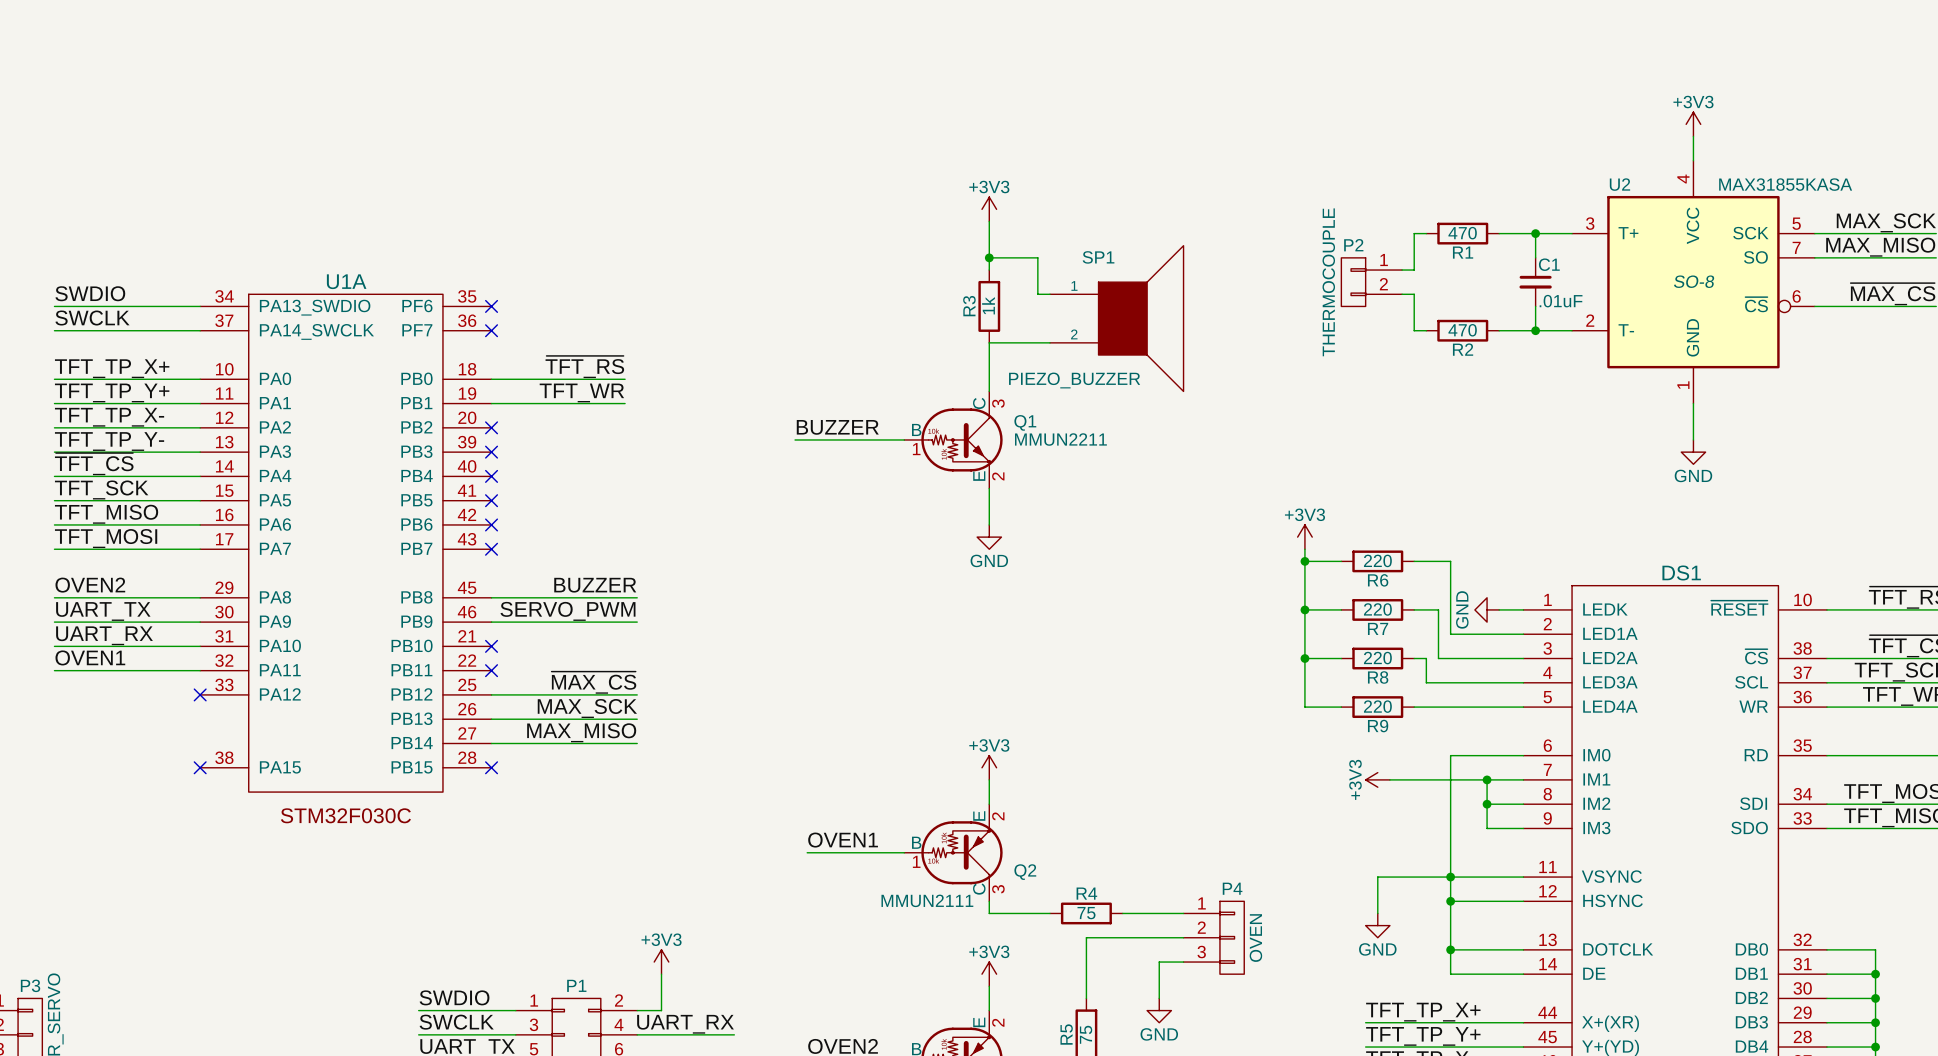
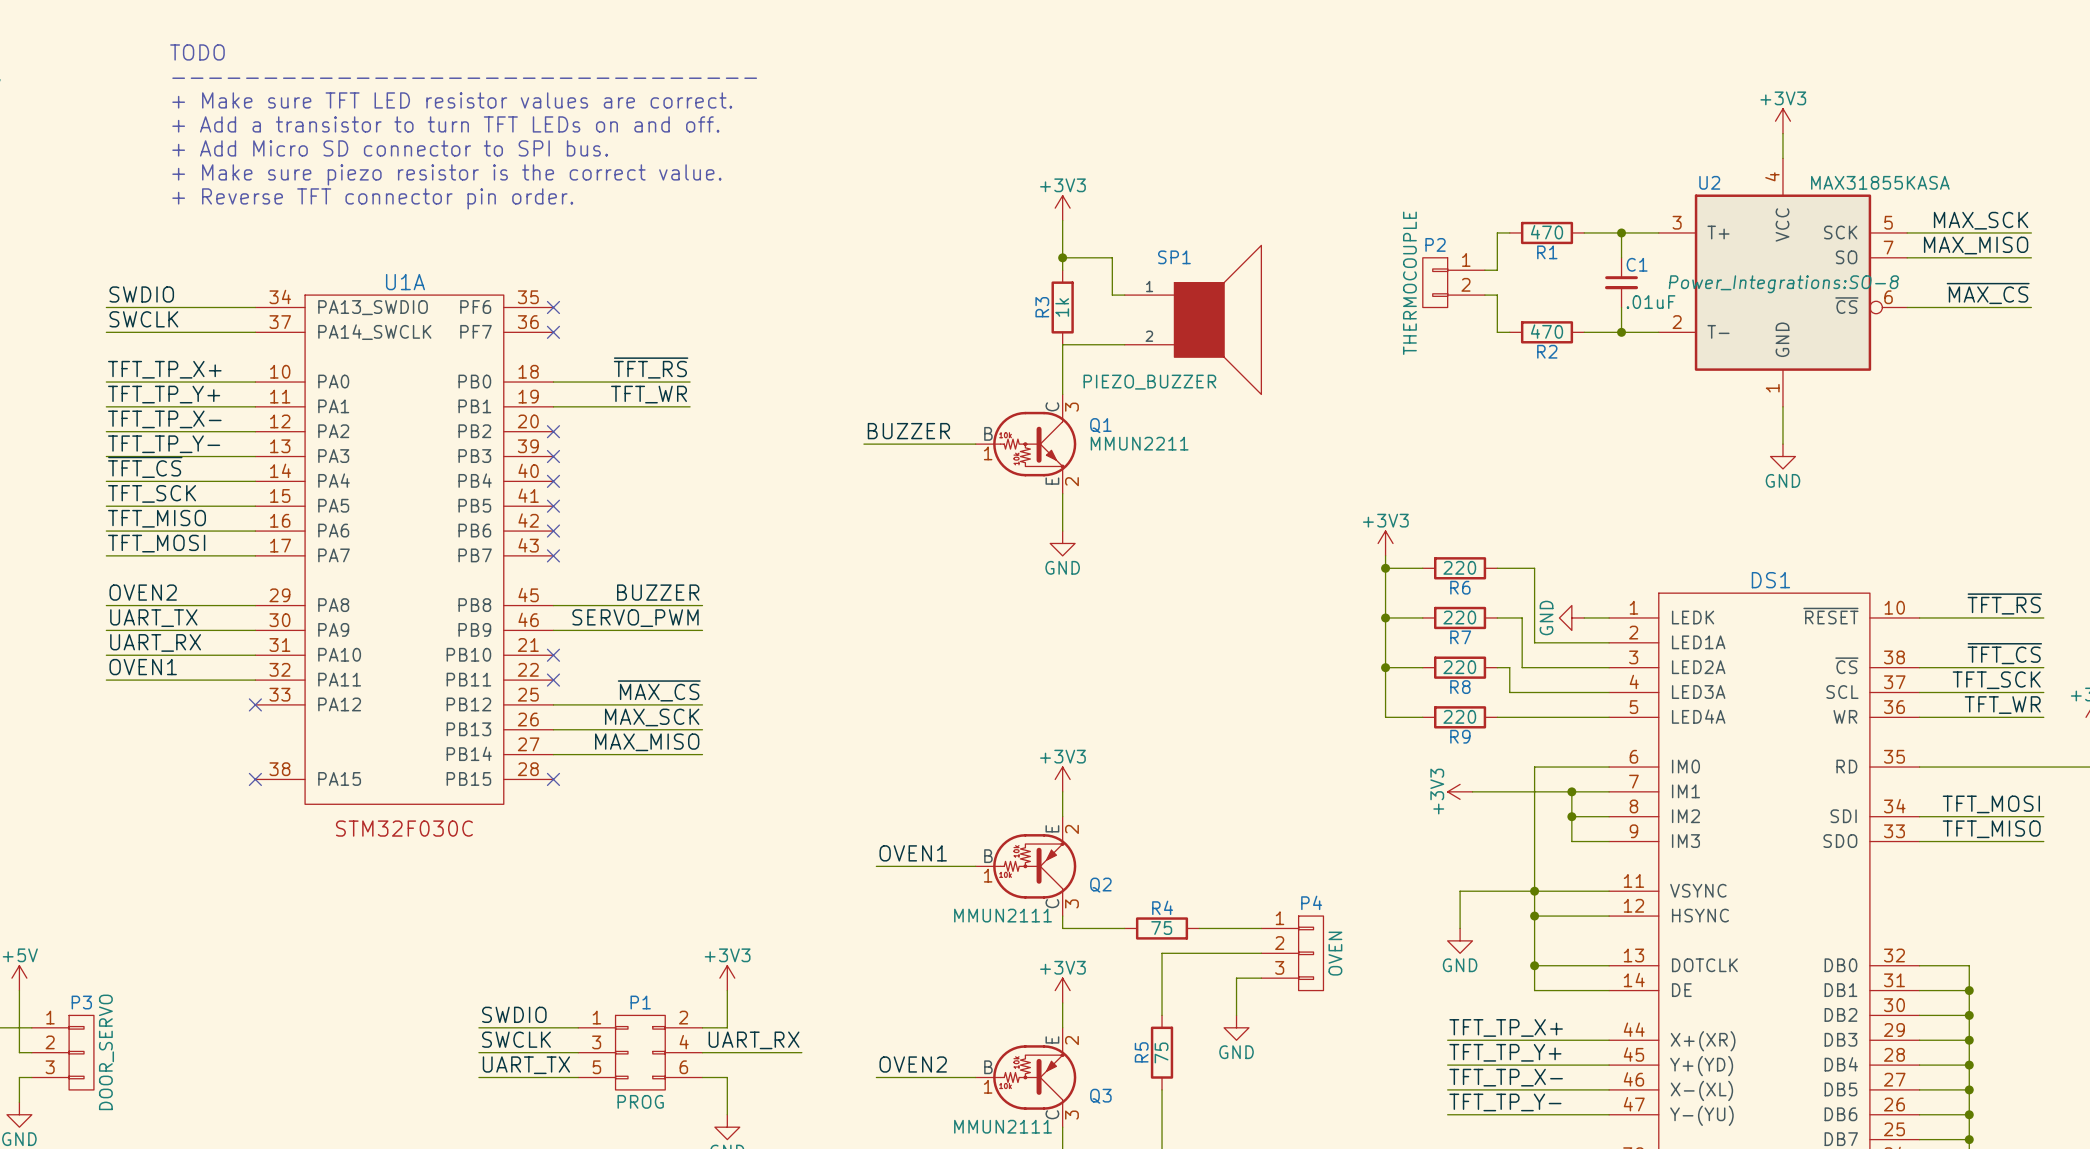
text: none -> TODO (197, 52)
text: none -> -------------------------------- (464, 78)
text: none -> + Make sure TFT LED resistor values are correct. (452, 100)
text: none -> + Add a transistor to turn TFT LEDs on and off. (445, 124)
text: none -> + Add Micro SD connector to SPI bus. (390, 148)
text: none -> + Make sure piezo resistor is the correct value. (446, 174)
text: none -> + Reverse TFT connector pin order. (372, 198)
U2 text: SO-8 (1694, 281) -> Power_Integrations:SO-8 (1783, 284)

